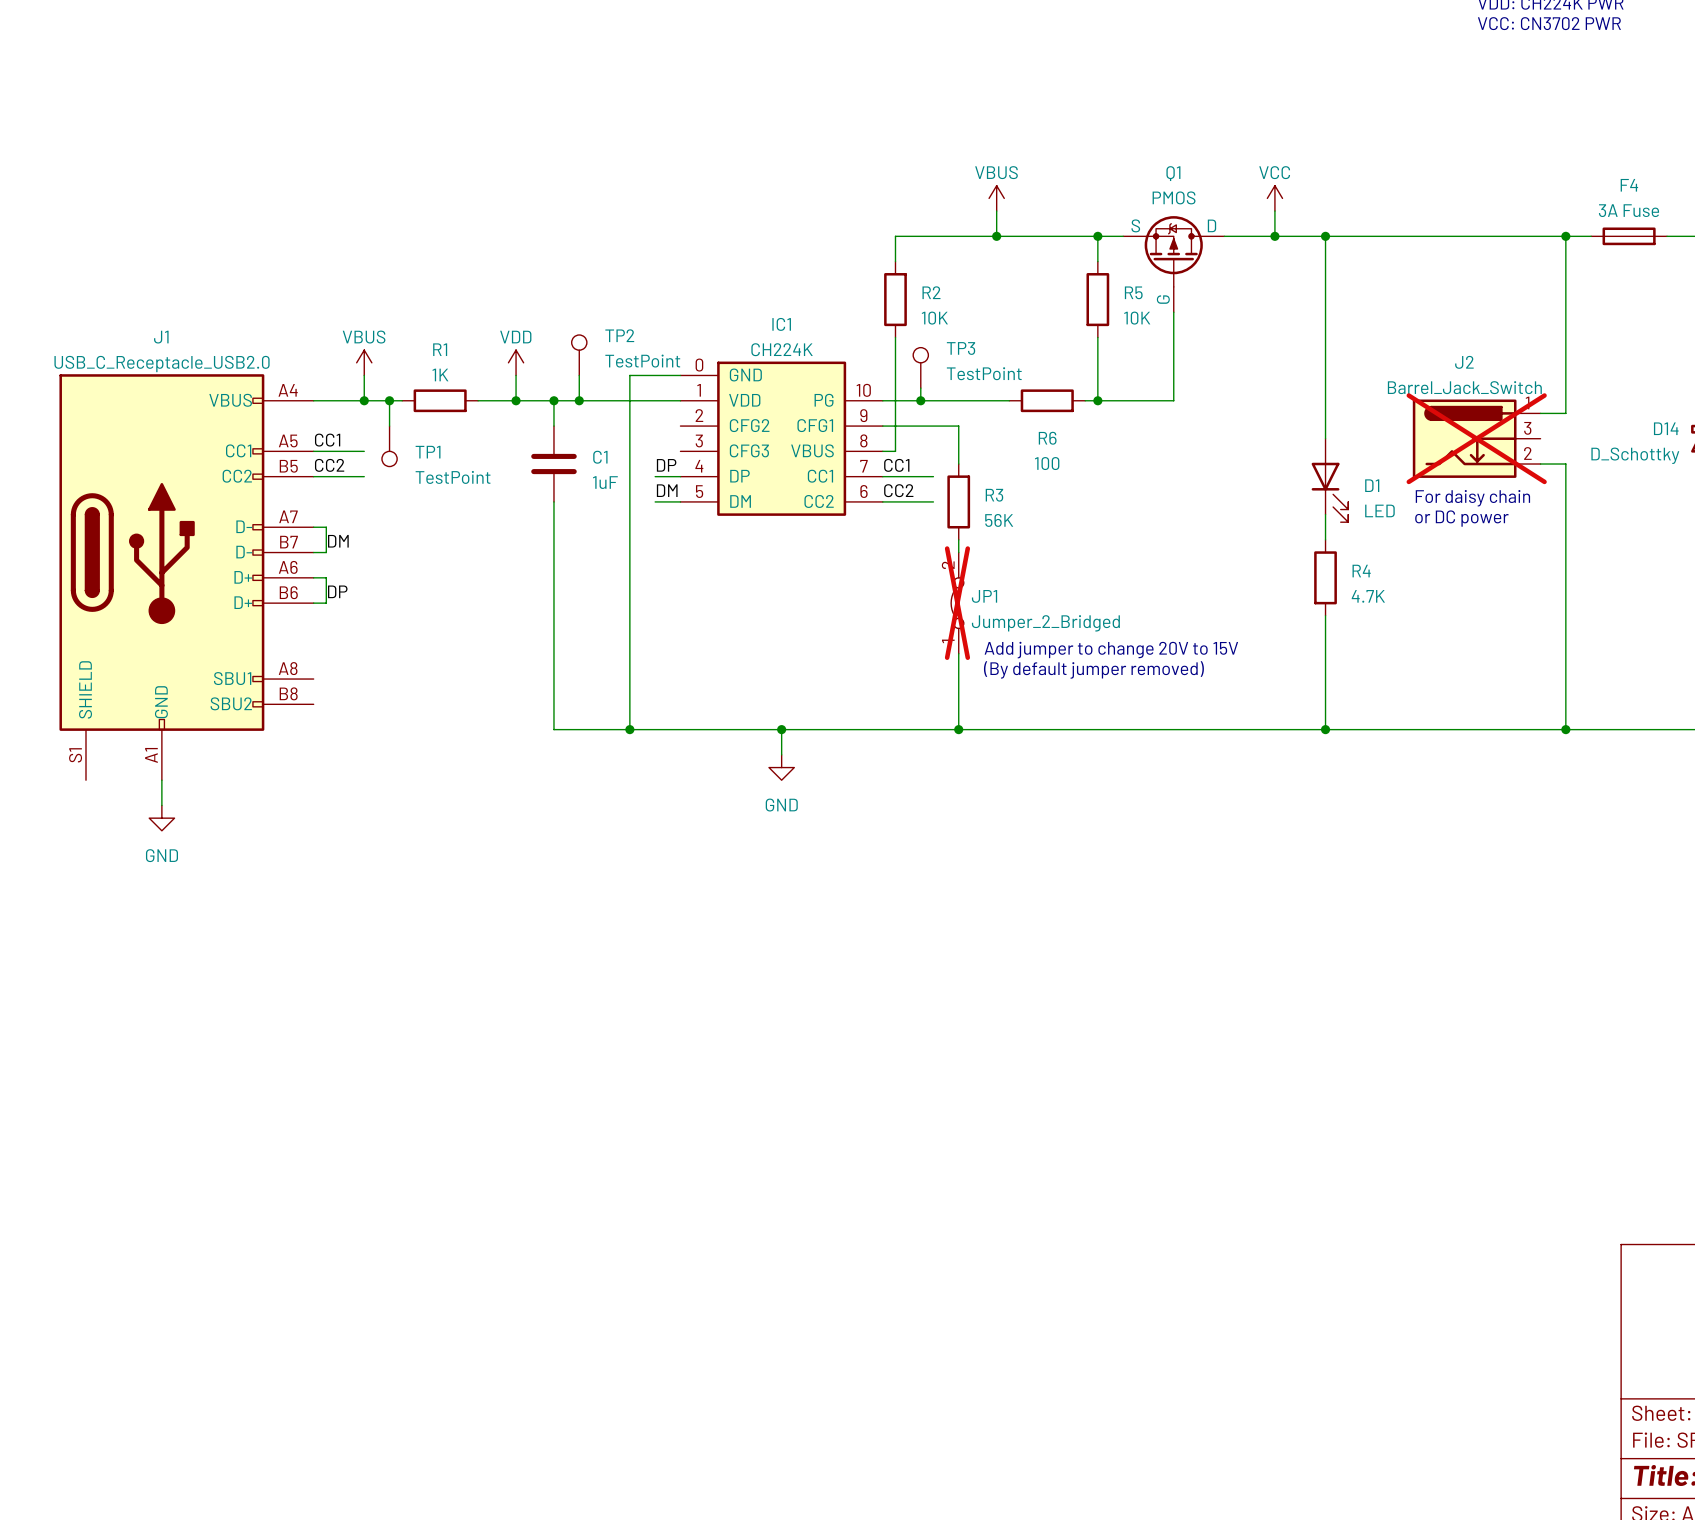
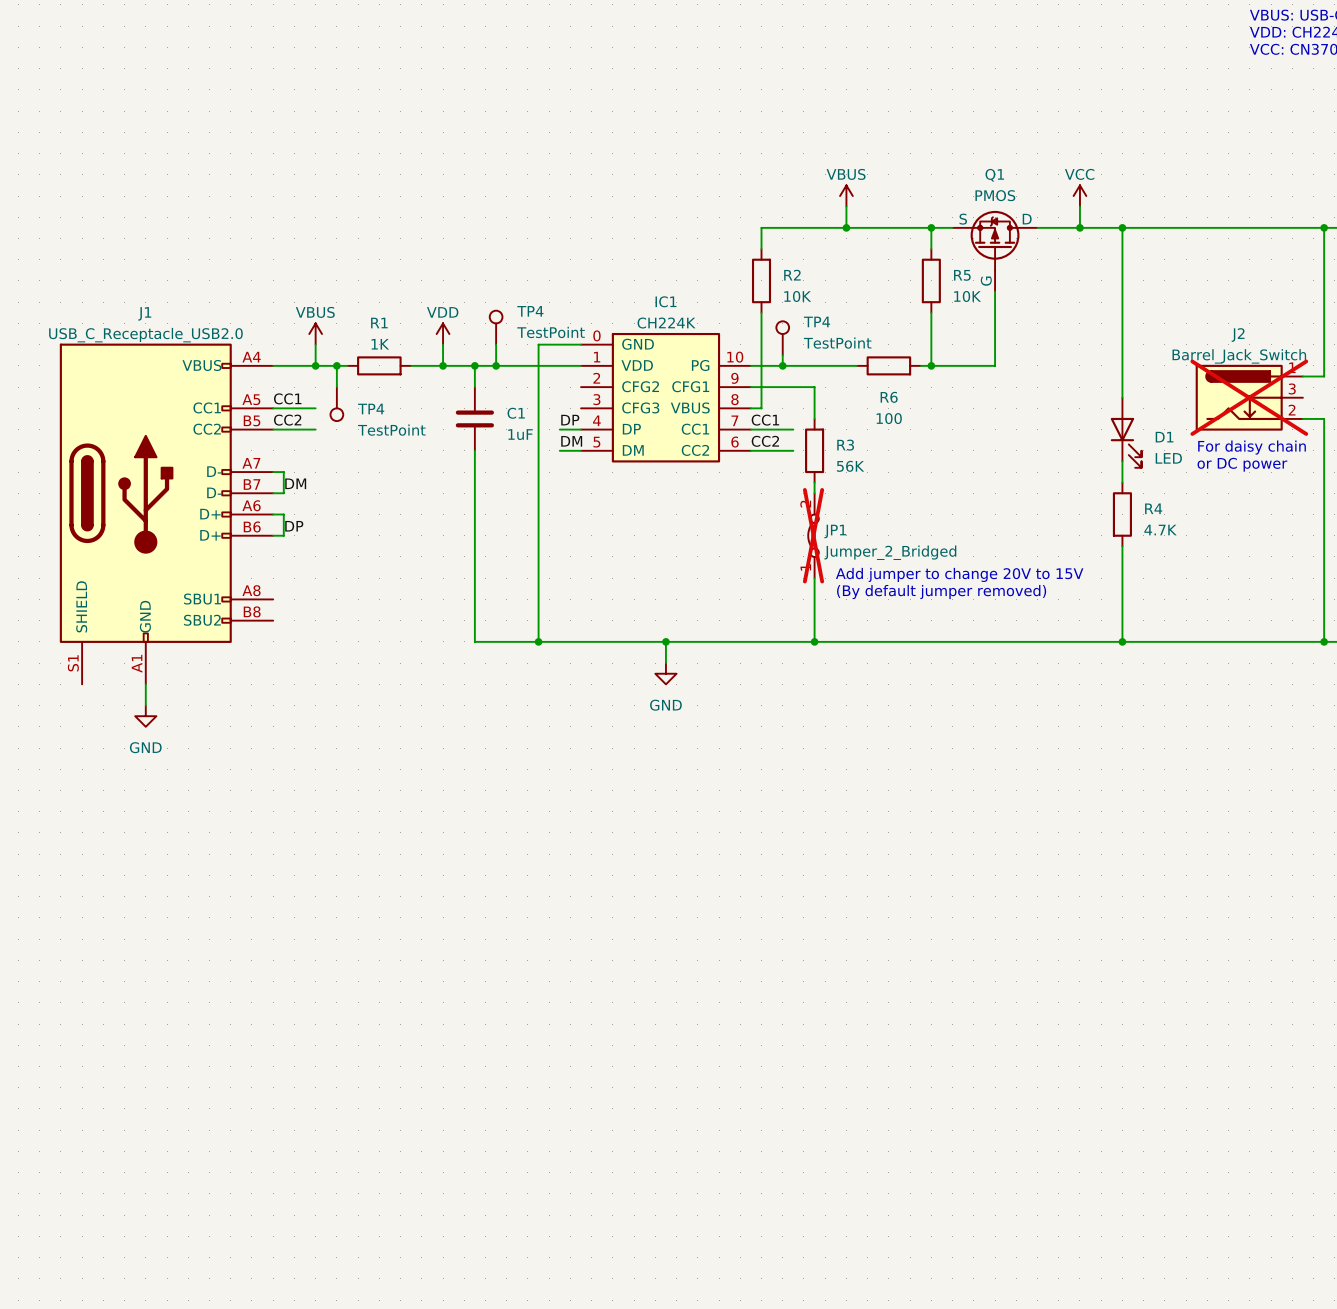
TP2 name: TP2 (619, 335) -> TP4 (530, 311)
TP3 name: TP3 (961, 348) -> TP4 (817, 321)
TP1 name: TP1 (428, 452) -> TP4 (371, 409)

